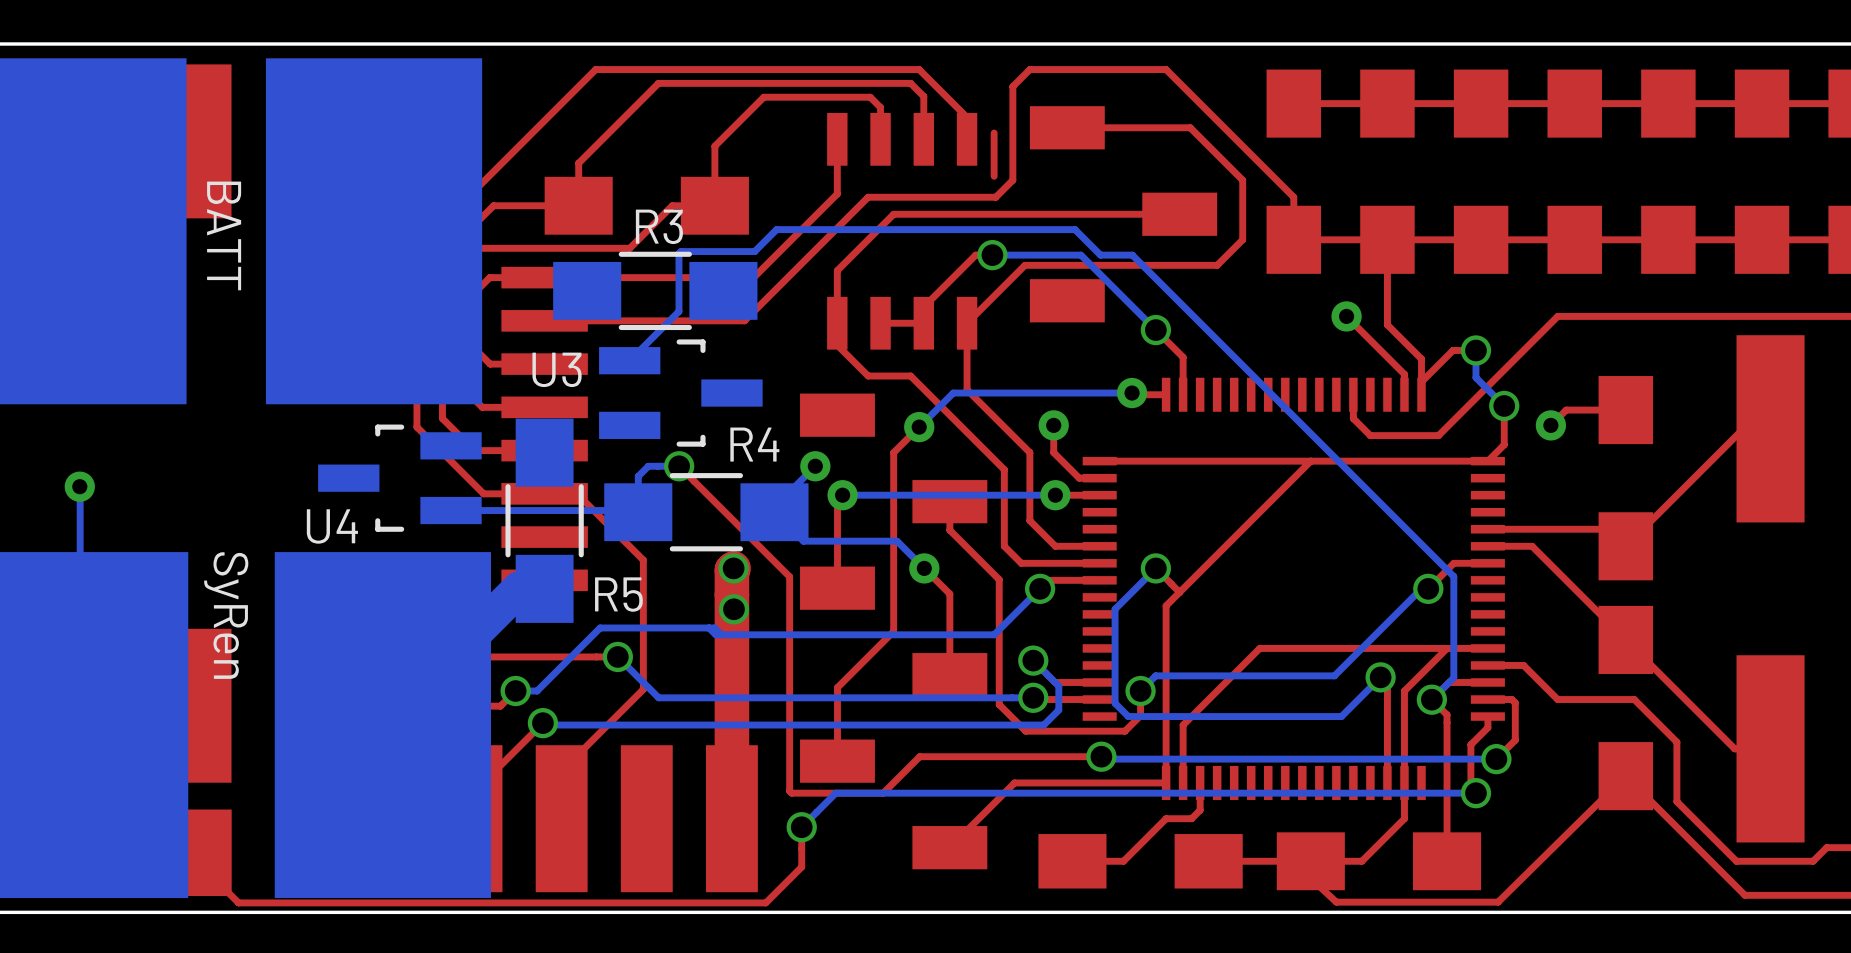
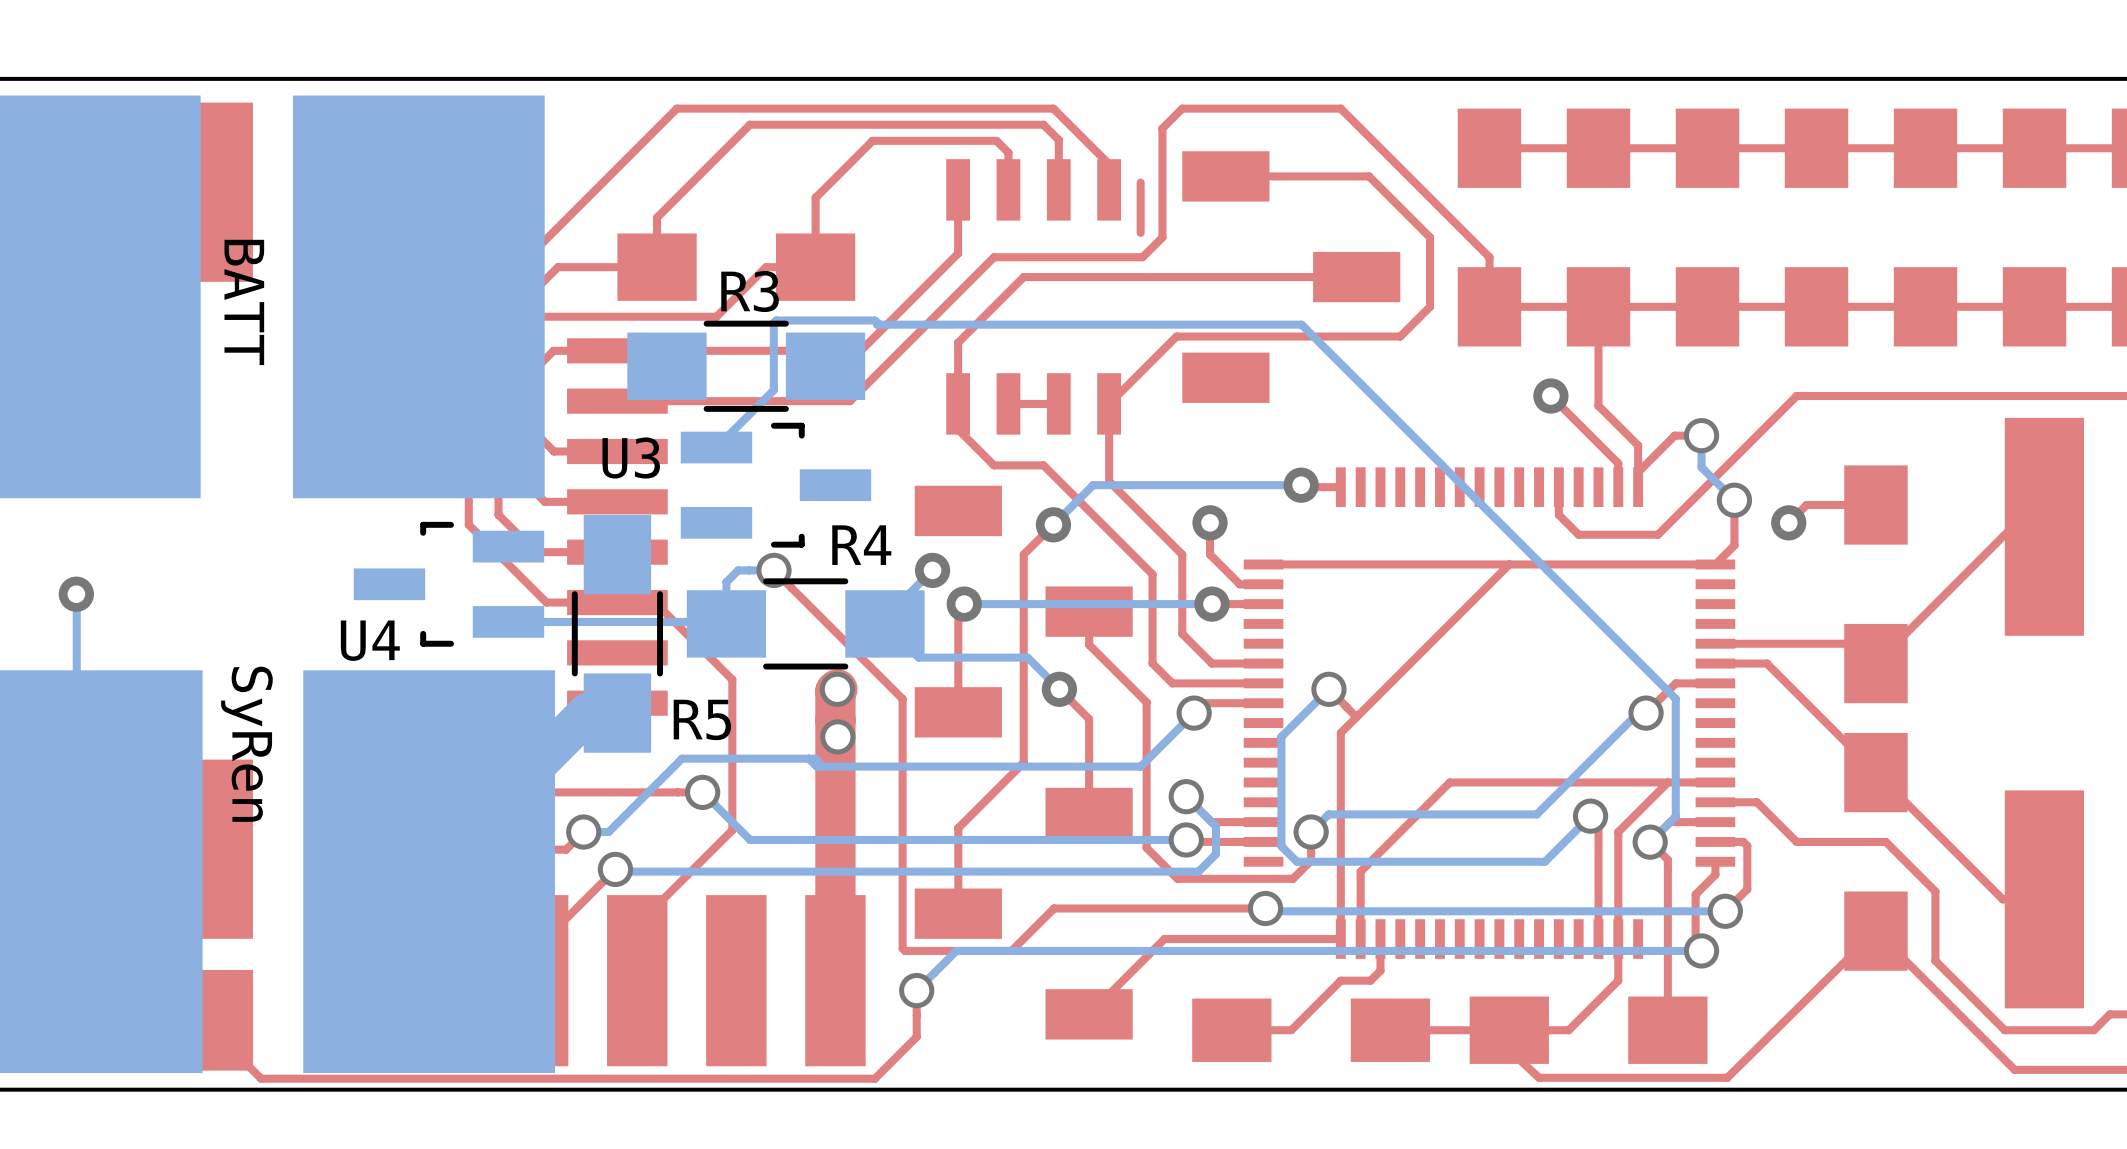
bottom track: (754, 251) (776, 229) (1075, 229) (1100, 255) -> (861, 320) (874, 320) (877, 324) (1138, 324)
top track: (992, 255) (975, 255) (923, 307) (923, 323) -> none
via: (992, 255) -> none
bottom track: (1080, 255) (1155, 330) -> (1241, 324) (1264, 324)
top track: (1155, 330) (1183, 357) (1183, 394) -> none
via: (1155, 330) -> none

